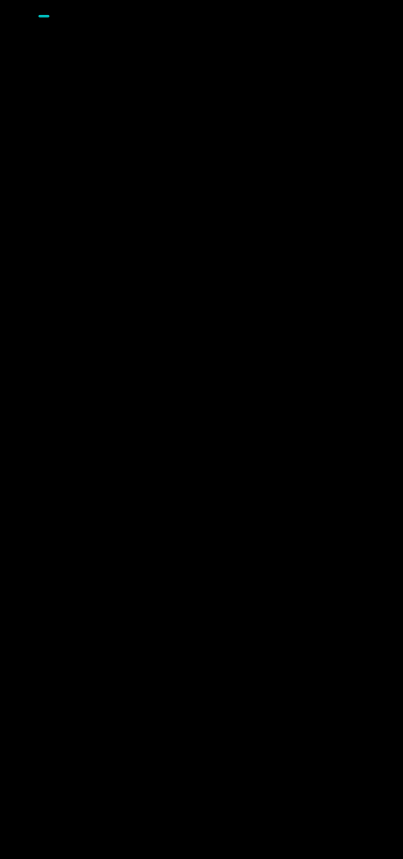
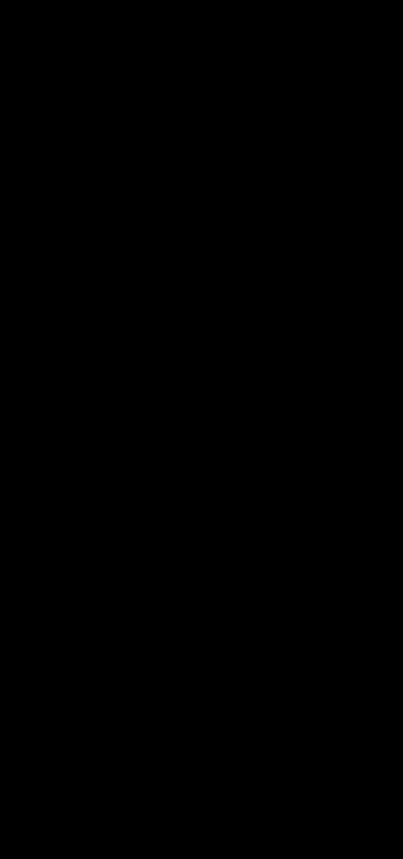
line: (39, 16) (48, 16) -> none

